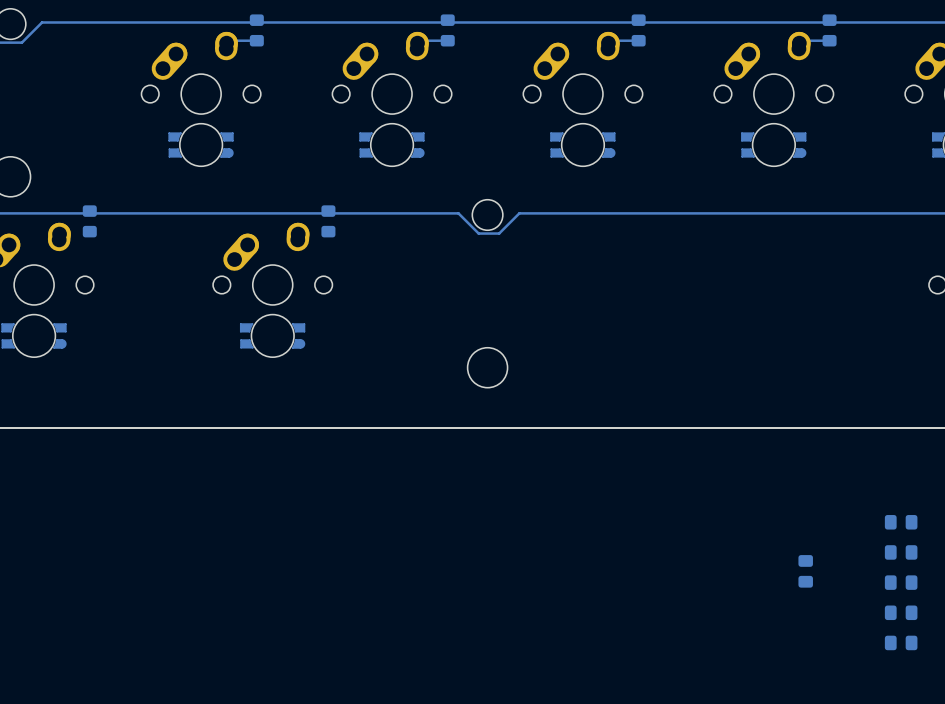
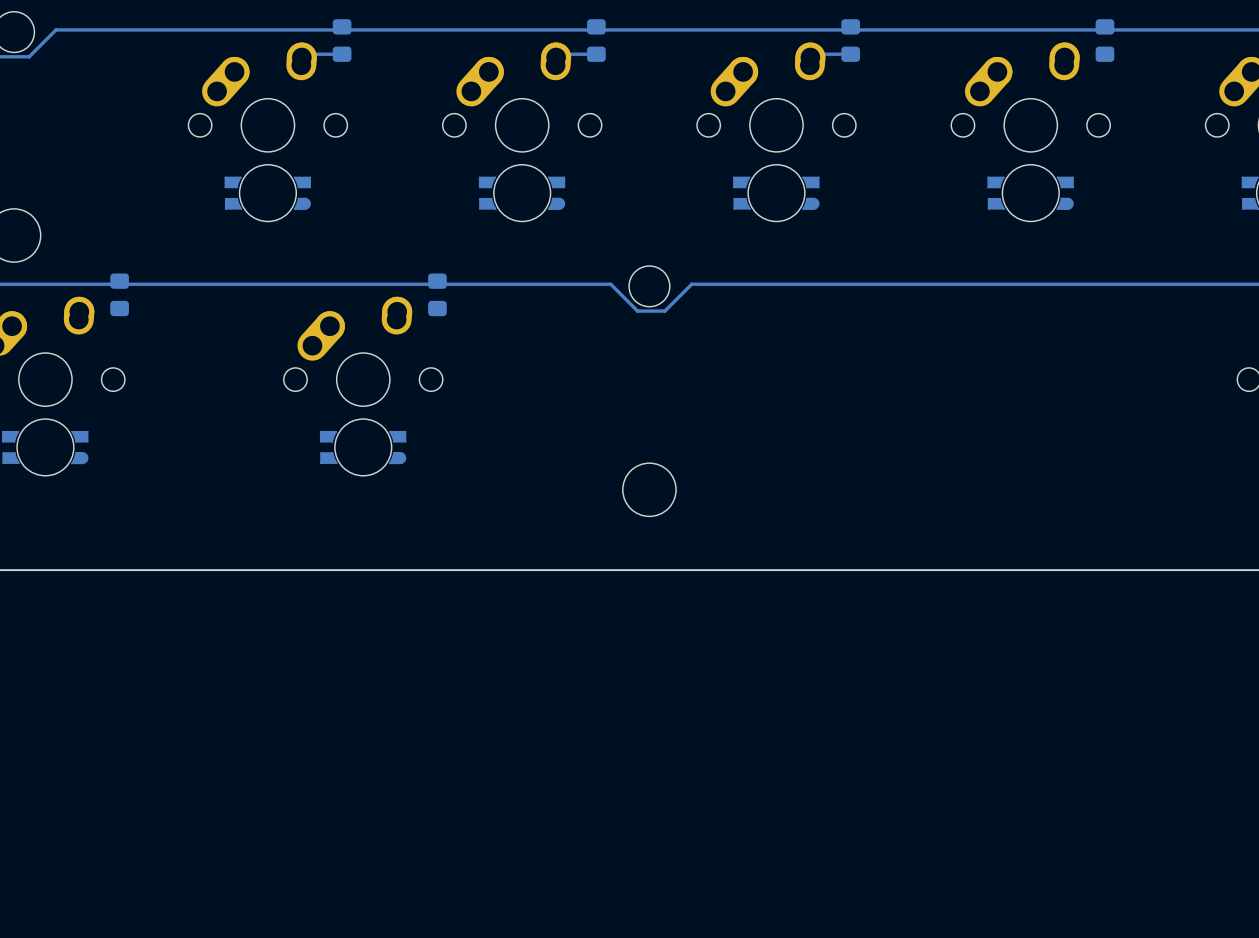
bottom track: (829, 40) (807, 40) (798, 48) -> none
part: (901, 522) -> none
part: (901, 552) -> none
part: (805, 571) -> none
part: (901, 582) -> none
part: (901, 612) -> none
part: (901, 642) -> none

